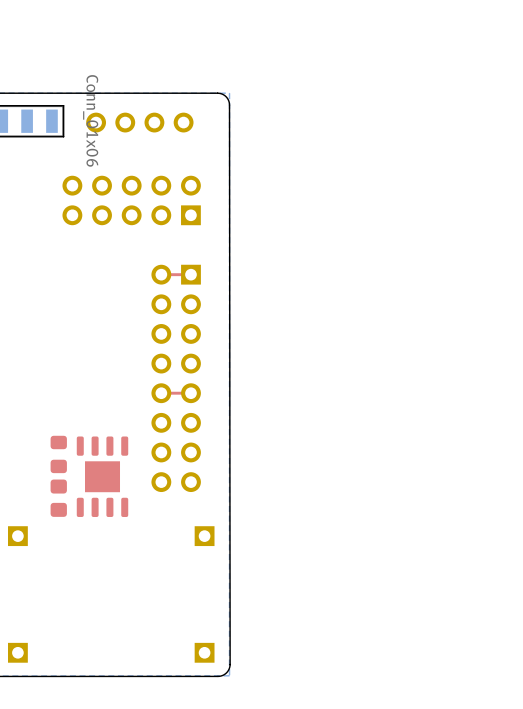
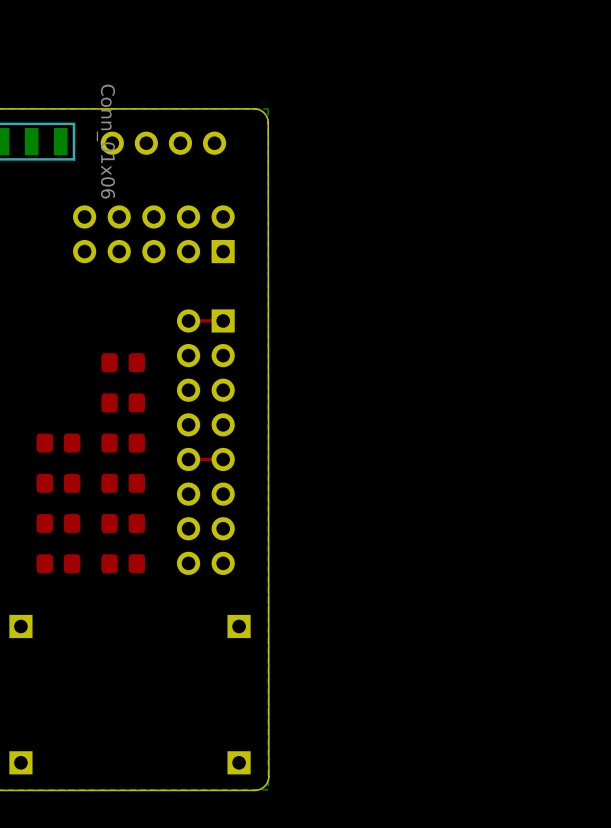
part: none -> (123, 362)
part: none -> (123, 402)
part: none -> (58, 443)
part: none -> (123, 443)
part: none -> (58, 483)
part: none -> (123, 483)
part footprint: [50, 435, 67, 474] -> [36, 514, 81, 534]
part footprint: [76, 436, 129, 517] -> [101, 554, 146, 574]
part: none -> (123, 523)
part rotation: 0° (58, 498) -> 90° clockwise (58, 563)

